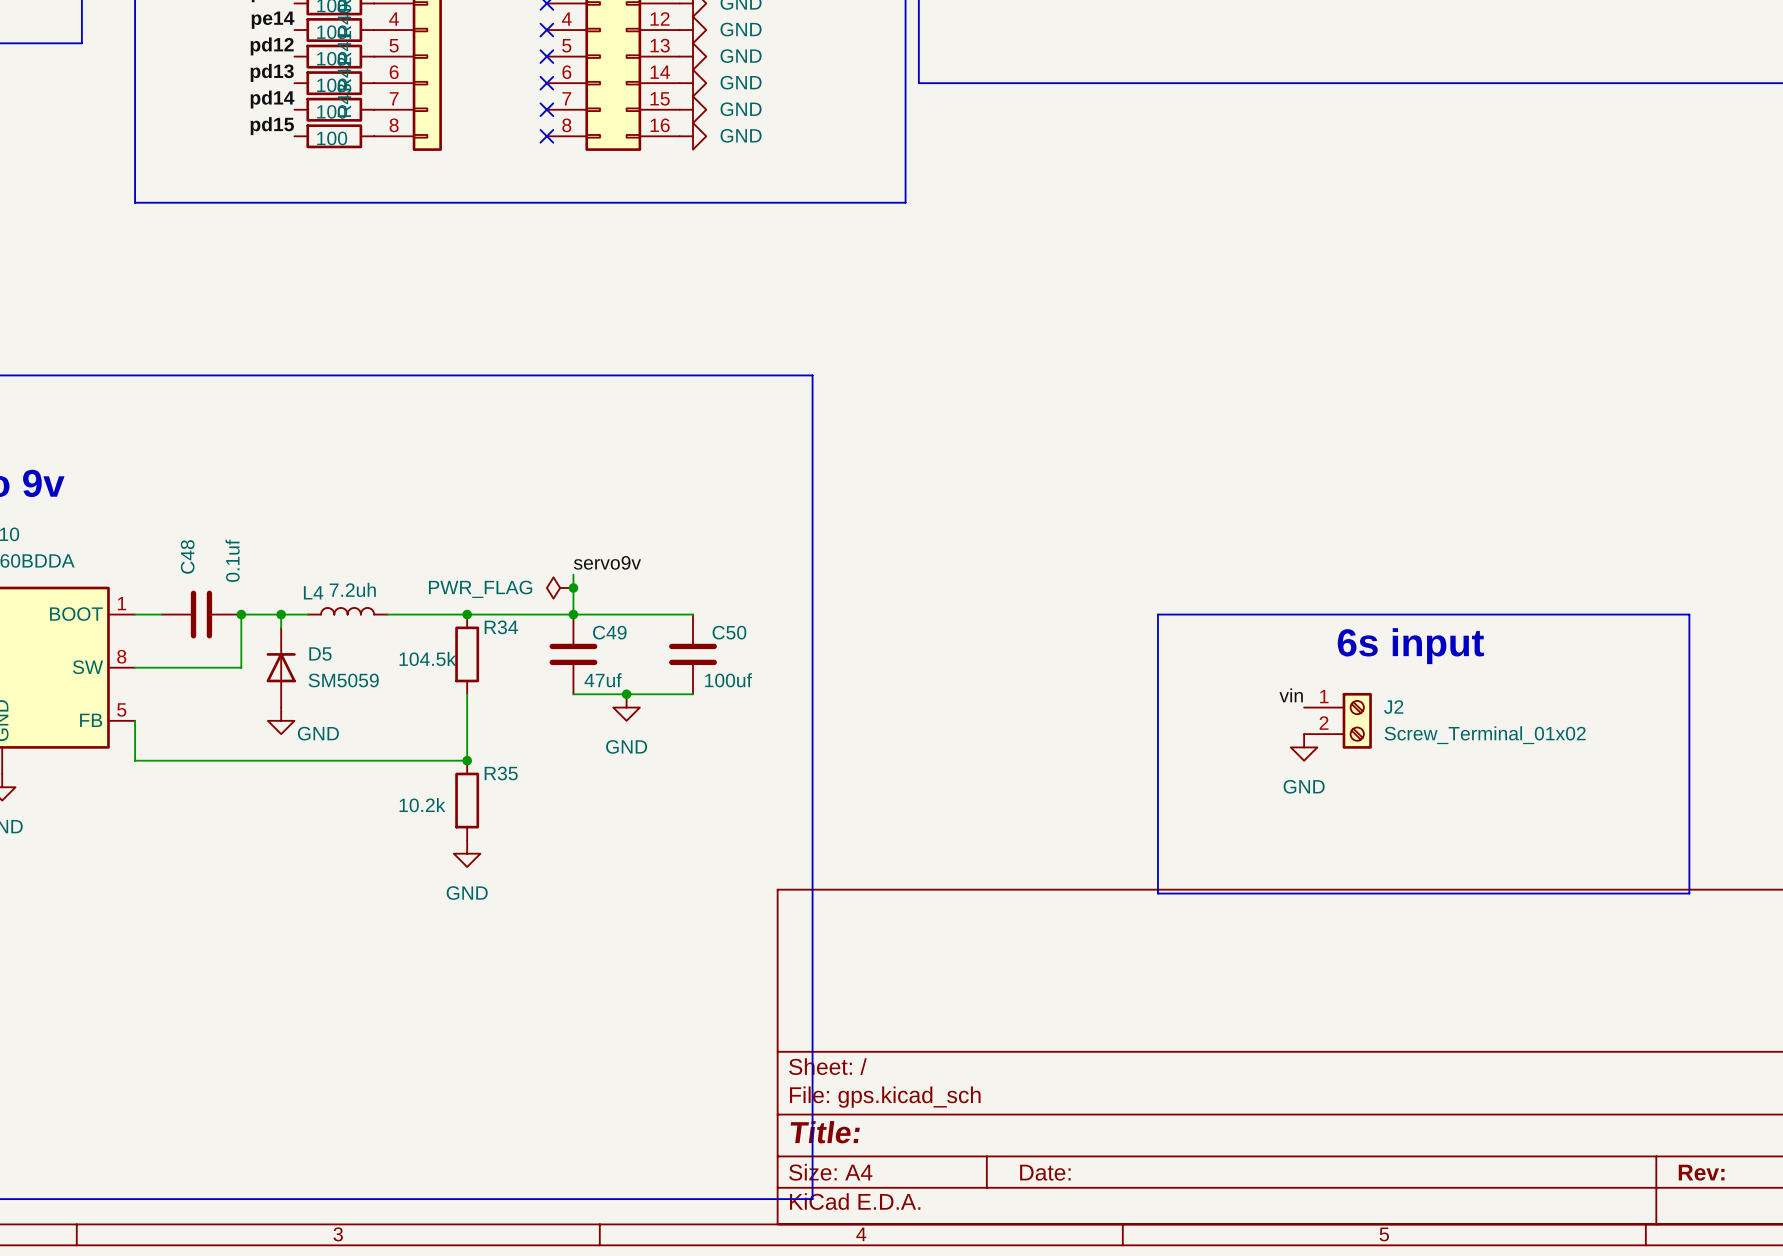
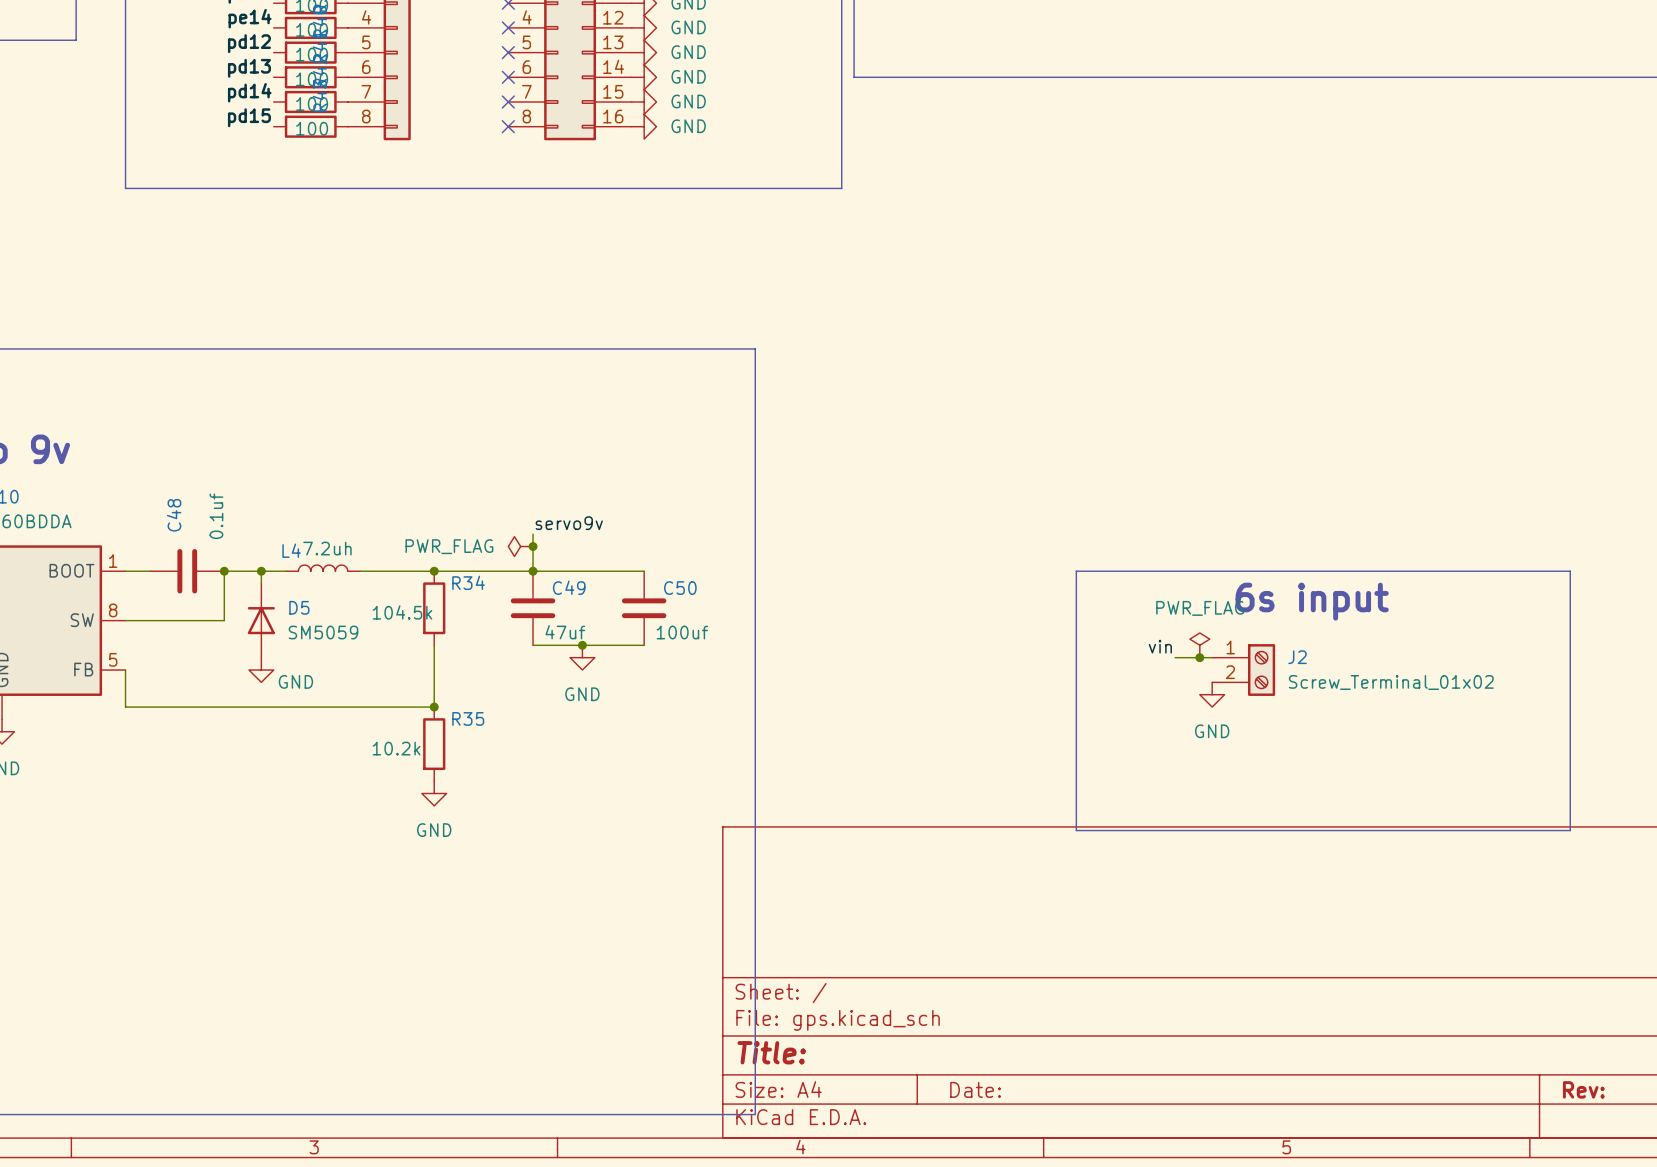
power symbol: none -> PWR_FLAG (1199, 645)
label position: vin (1291, 695) -> vin (1160, 646)
wire: none -> (1175, 657) (1212, 657)
junction: none -> (1199, 657)

